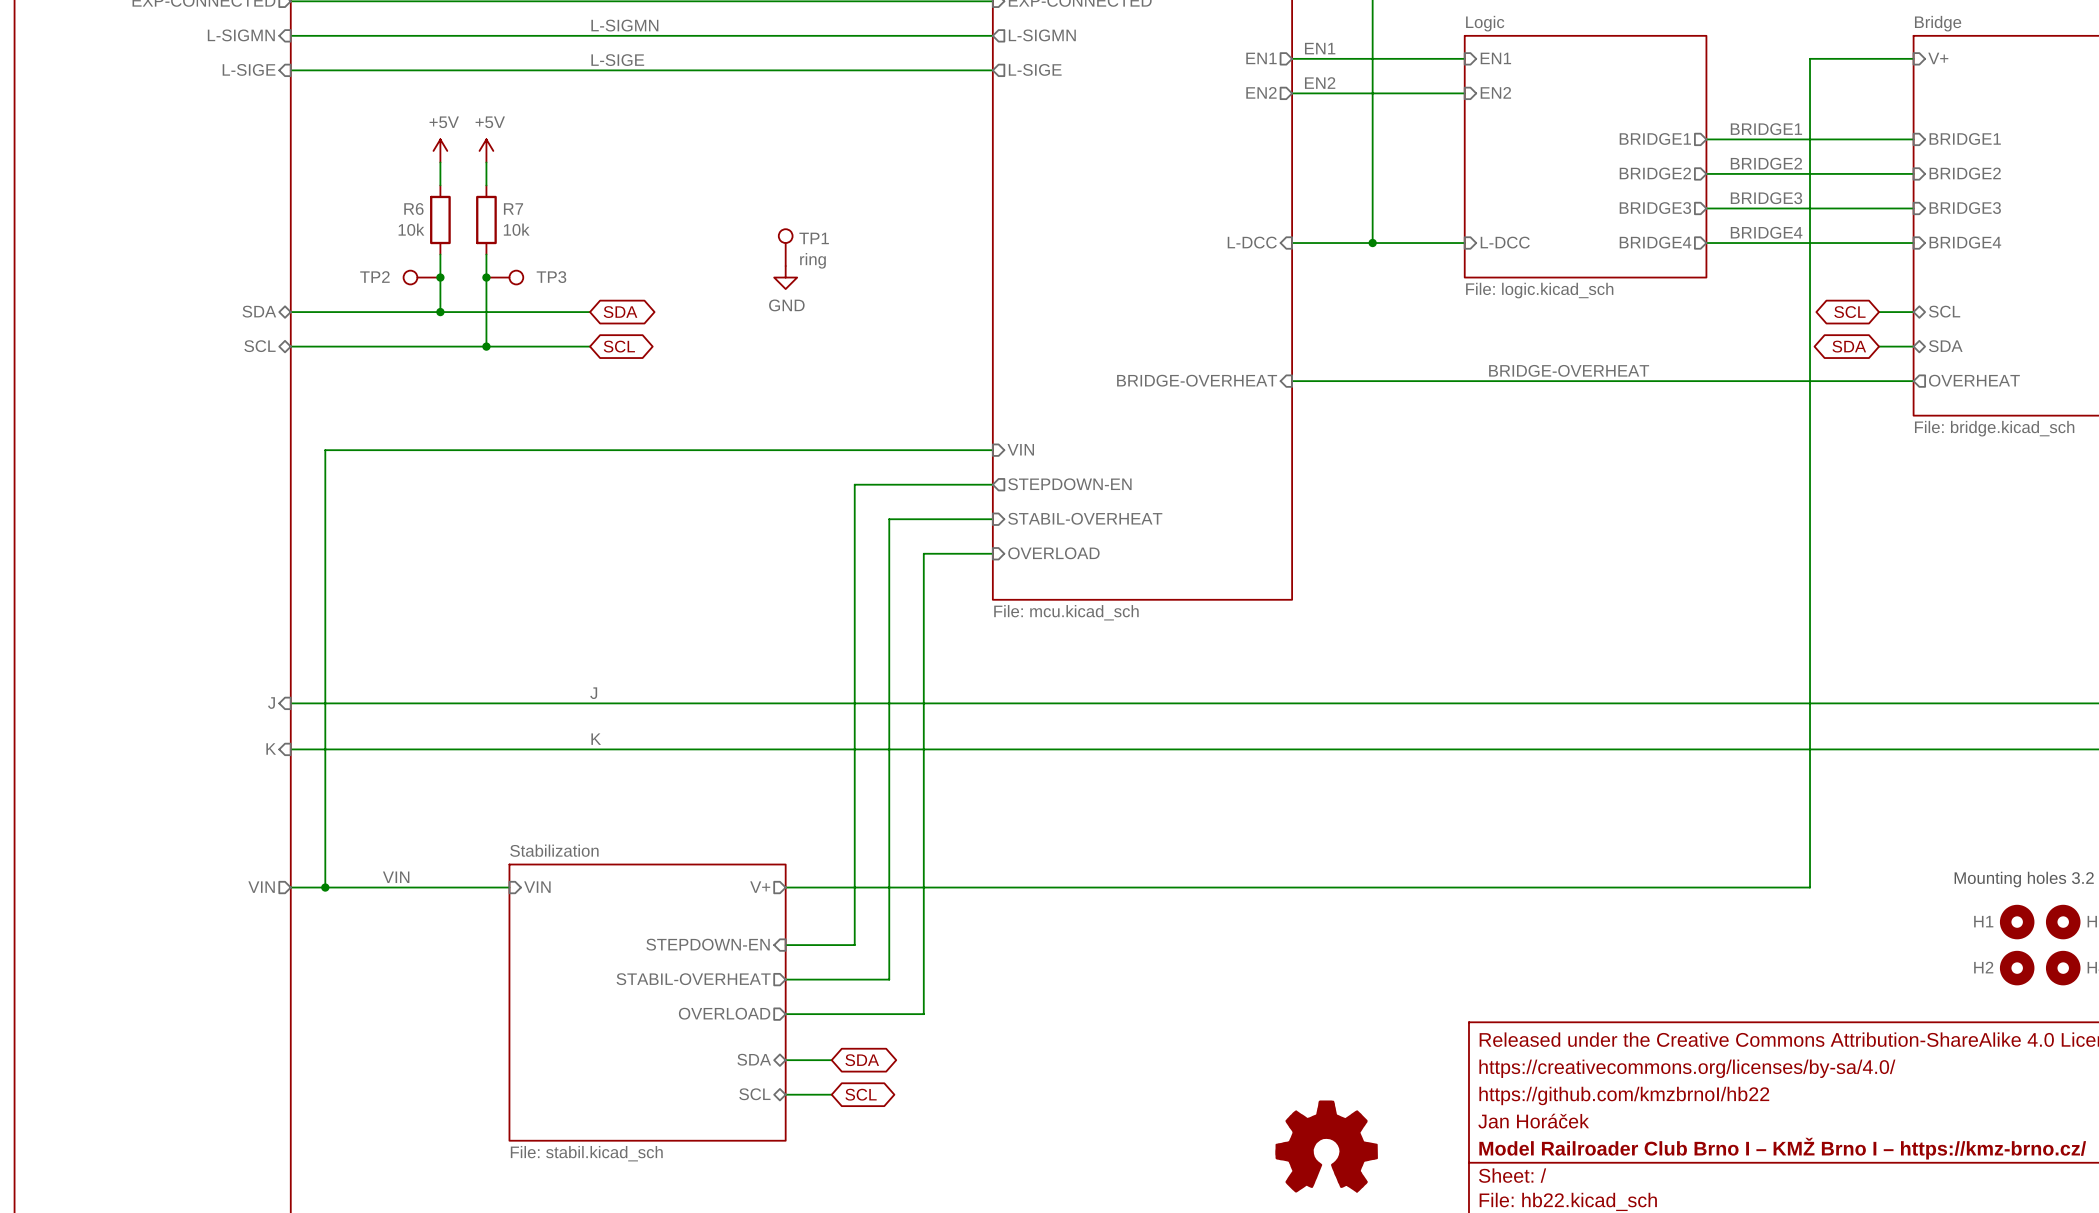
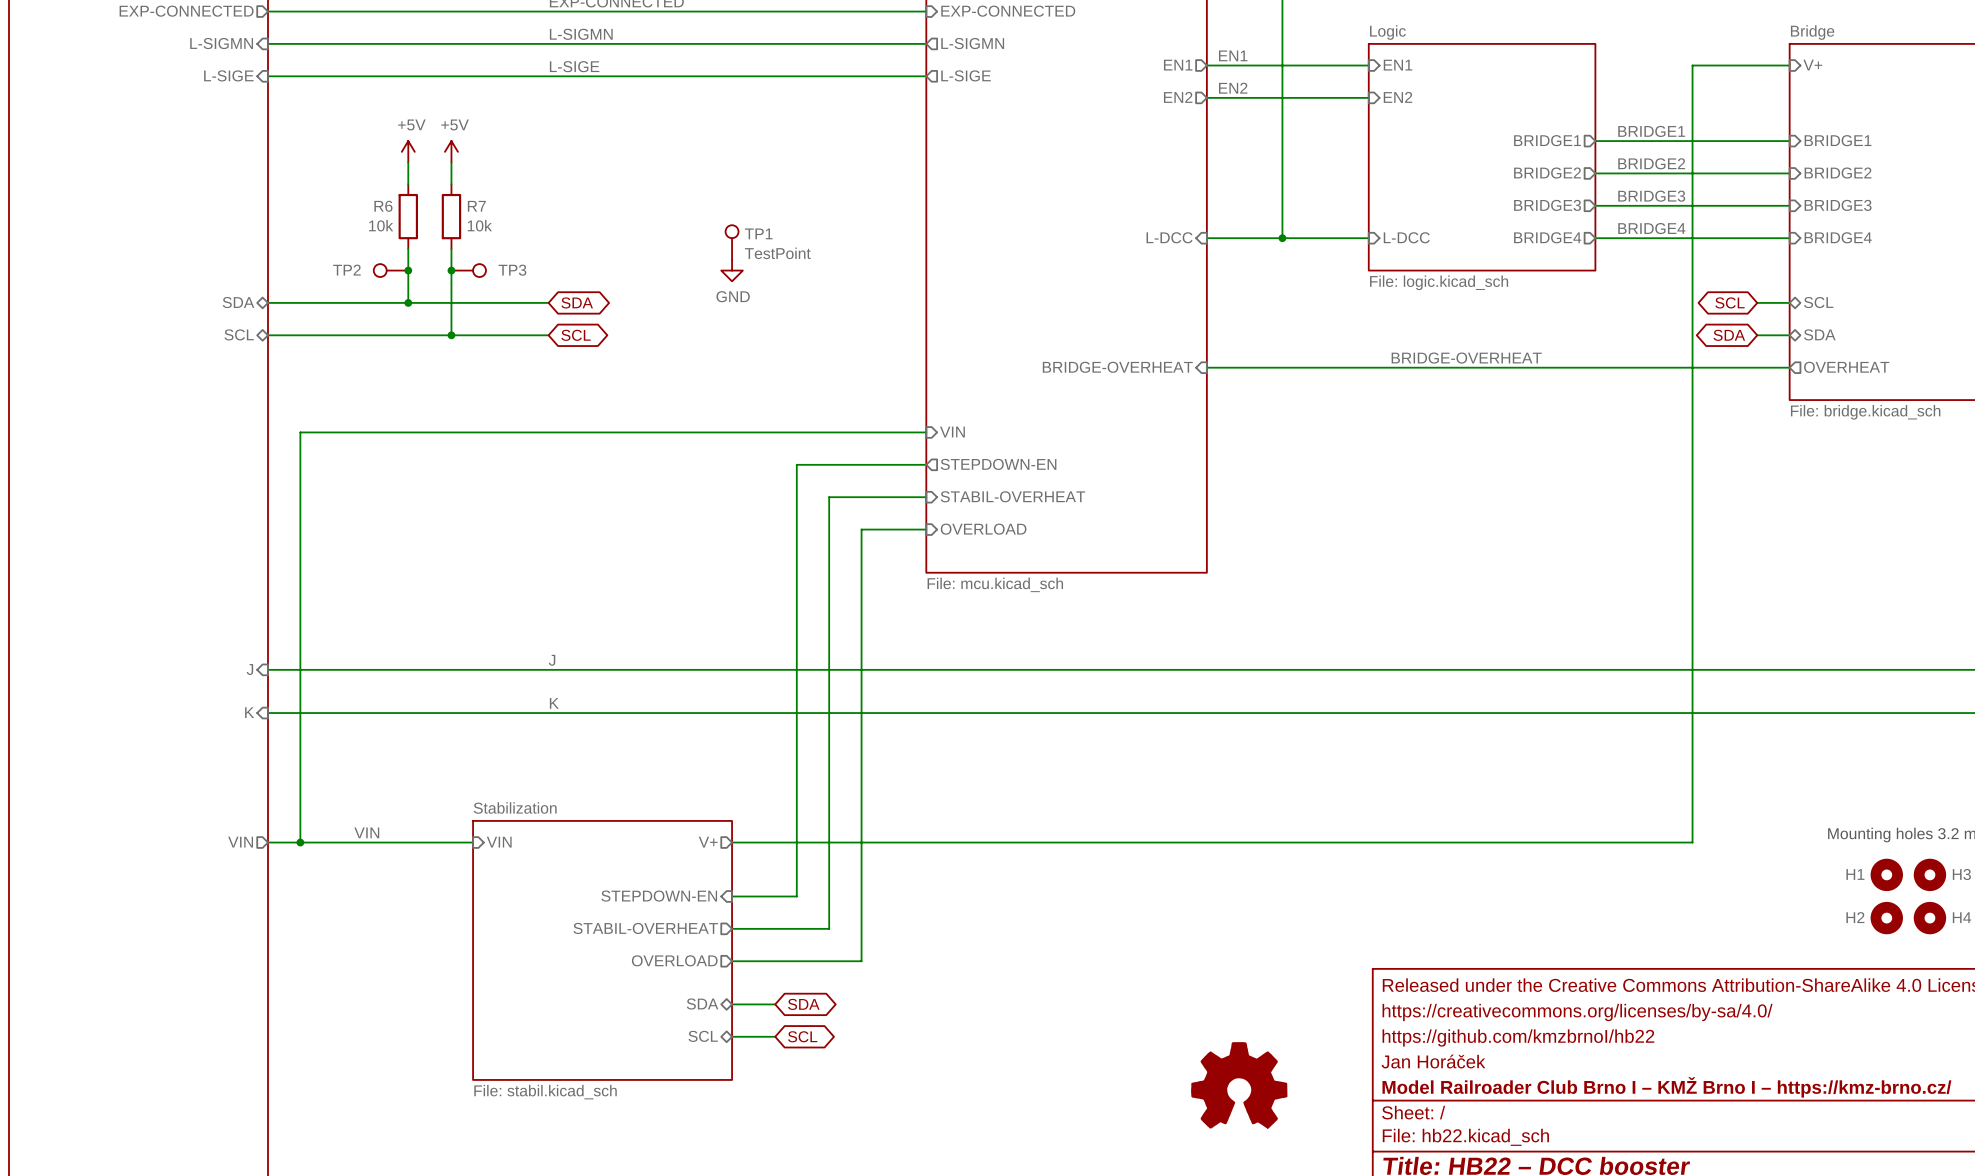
TP1 value: ring (812, 260) -> TestPoint (777, 253)

